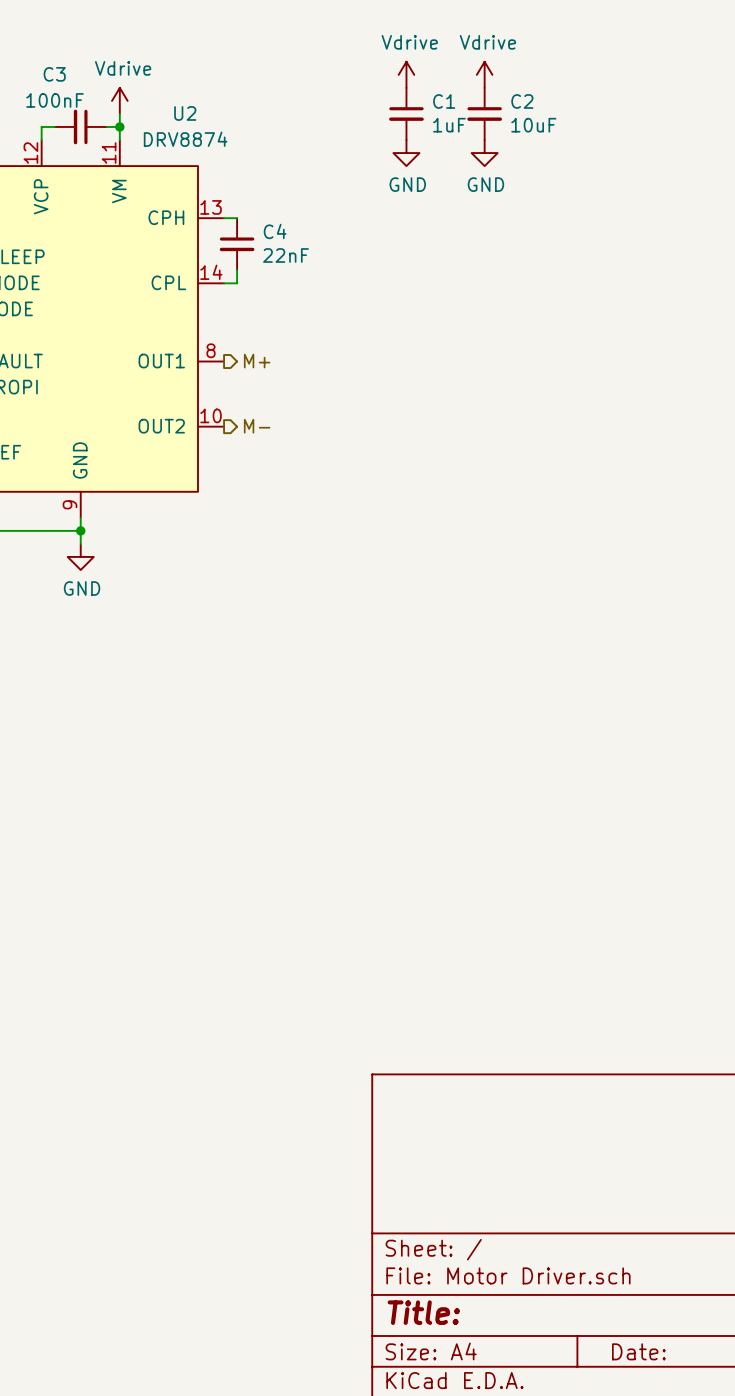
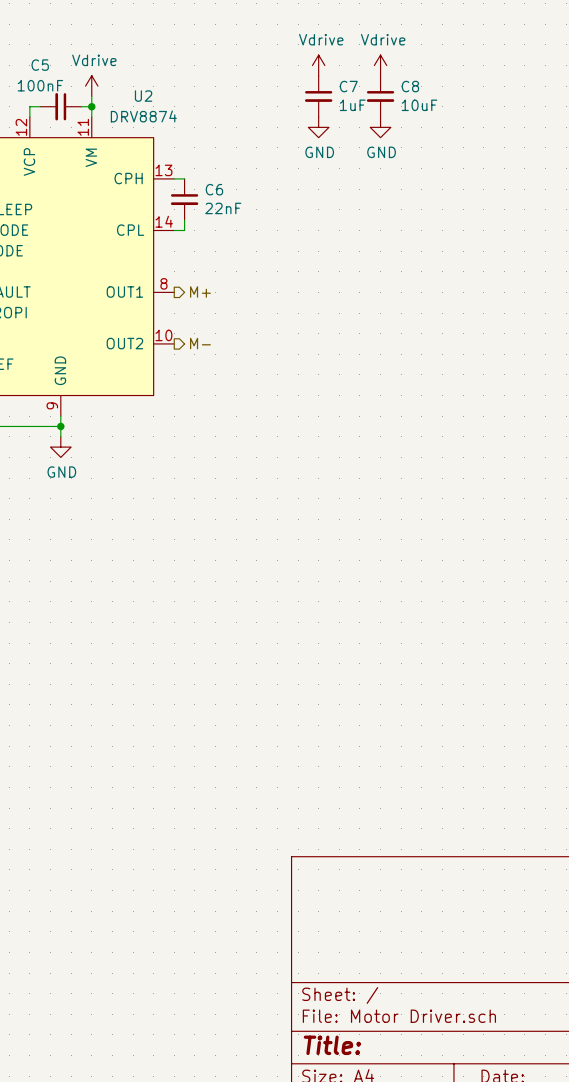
C3 name: C3 (54, 74) -> C5 (40, 65)
C1 name: C1 (444, 101) -> C7 (348, 86)
C2 name: C2 (522, 101) -> C8 (410, 86)
C4 name: C4 (275, 231) -> C6 (214, 189)

